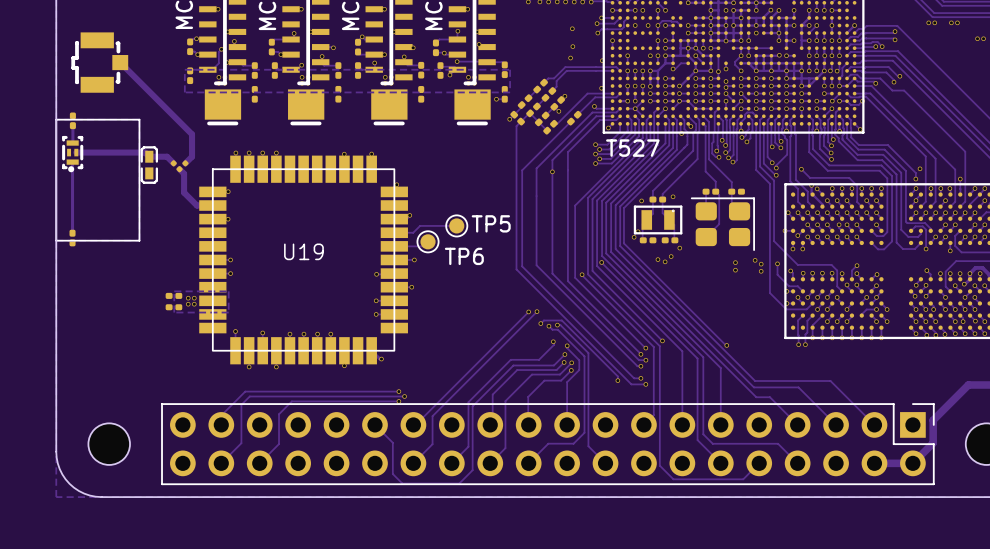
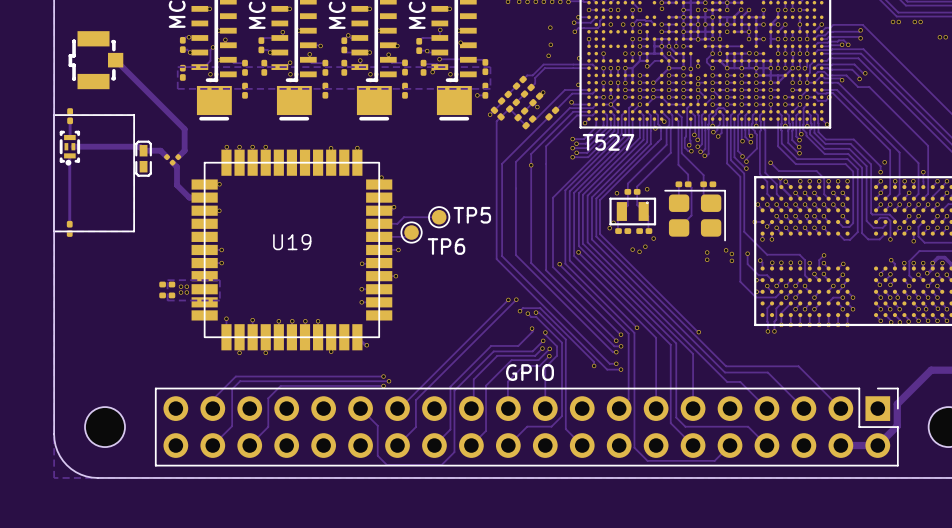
via: none -> (661, 8)
via: none -> (639, 31)
text: none -> GPIO (529, 372)

